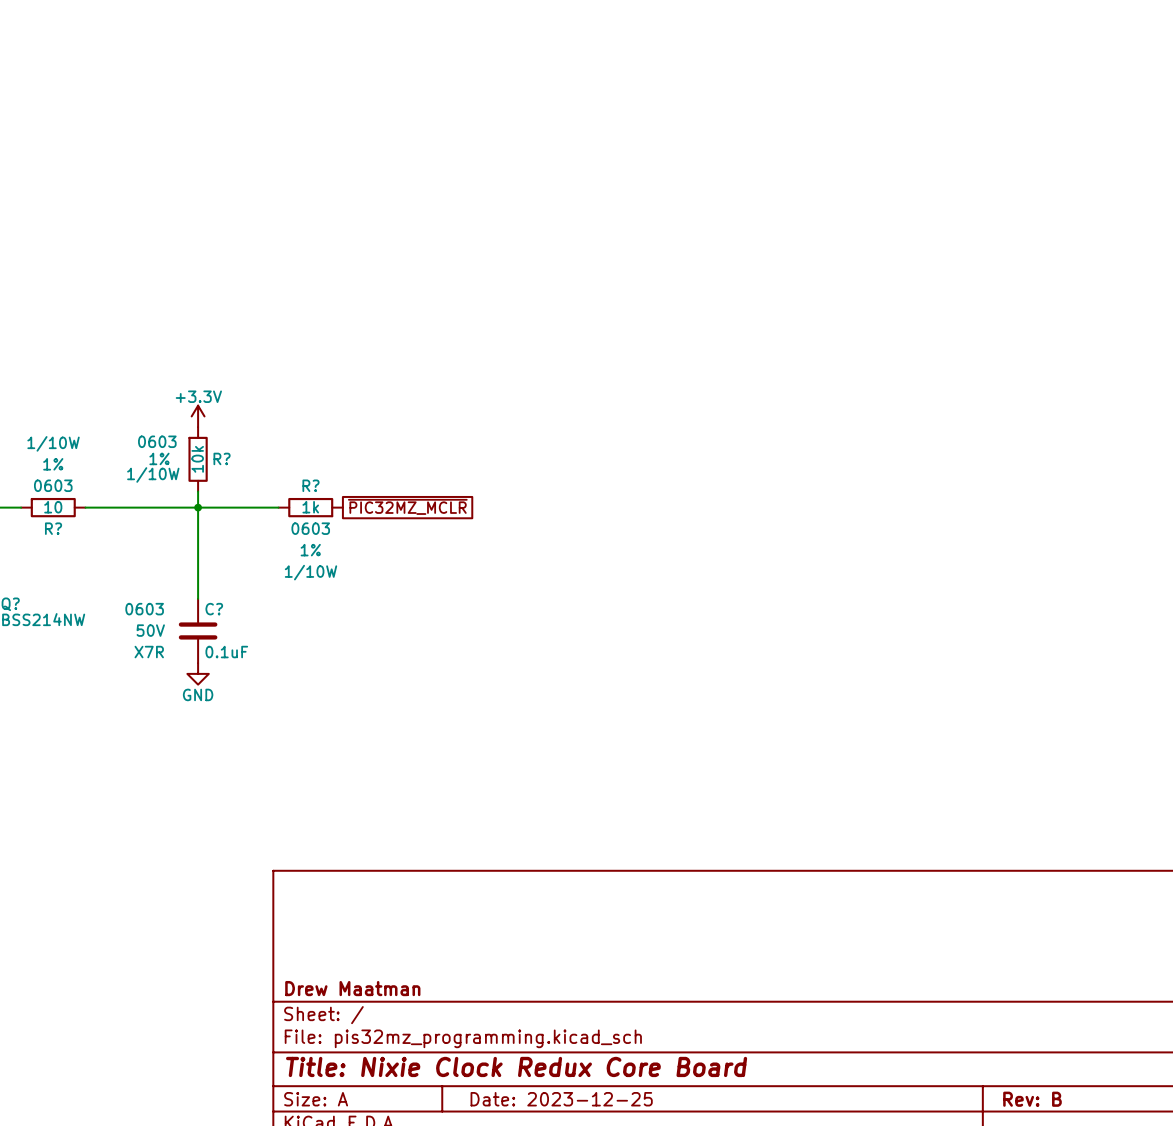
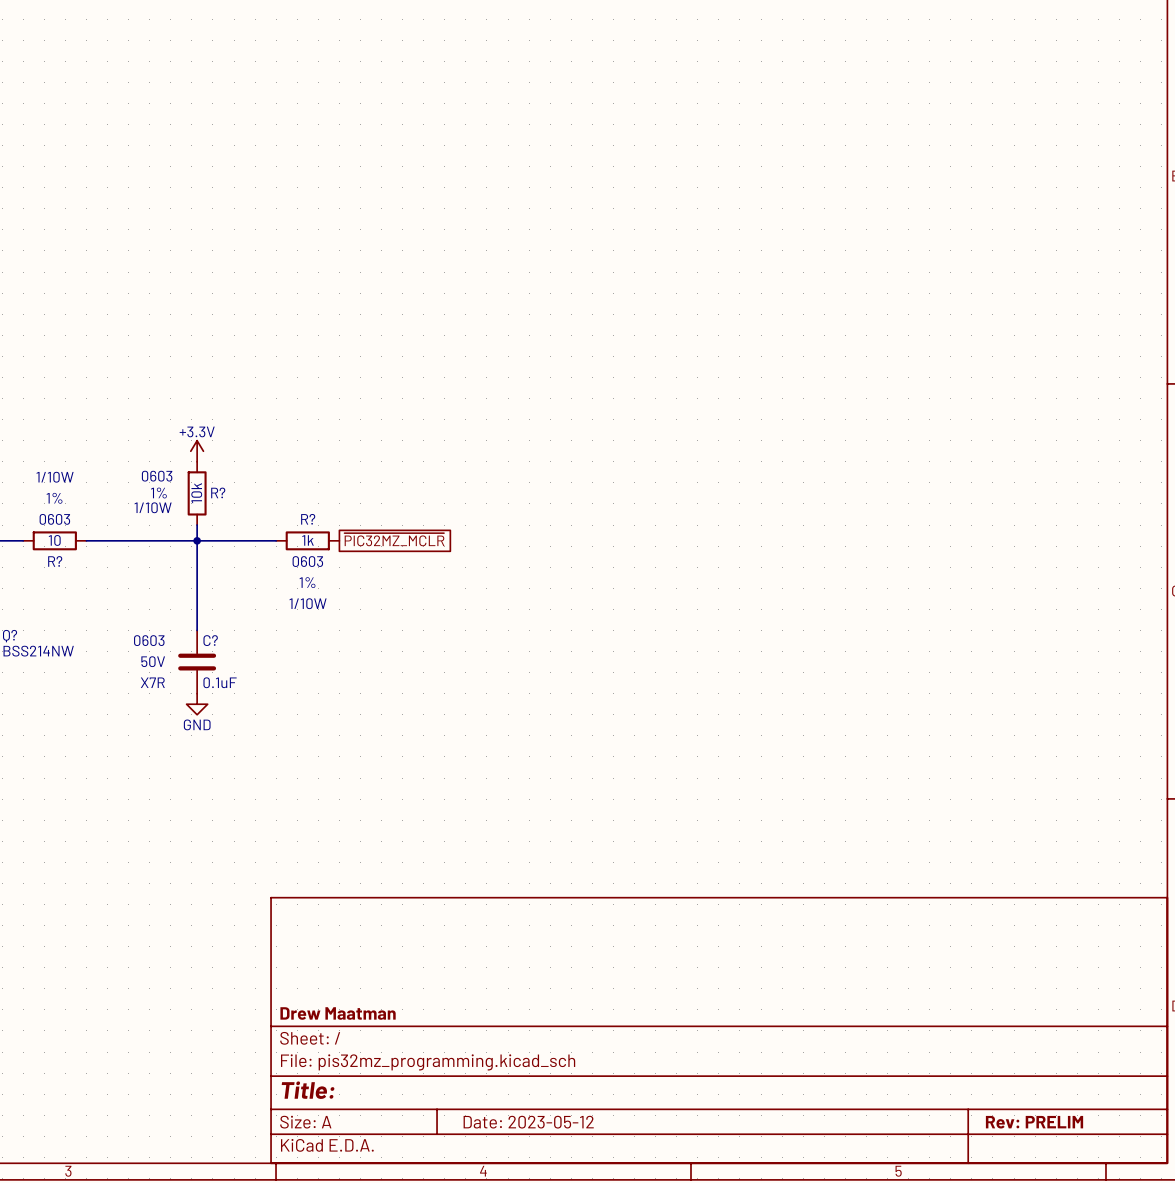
title block: Title: Nixie Clock Redux Core Board (516, 1066) -> Title: (308, 1090)
title block: Date: 2023-12-25 (561, 1099) -> Date: 2023-05-12 (528, 1122)
title block: Rev: B (1032, 1099) -> Rev: PRELIM (1034, 1122)

